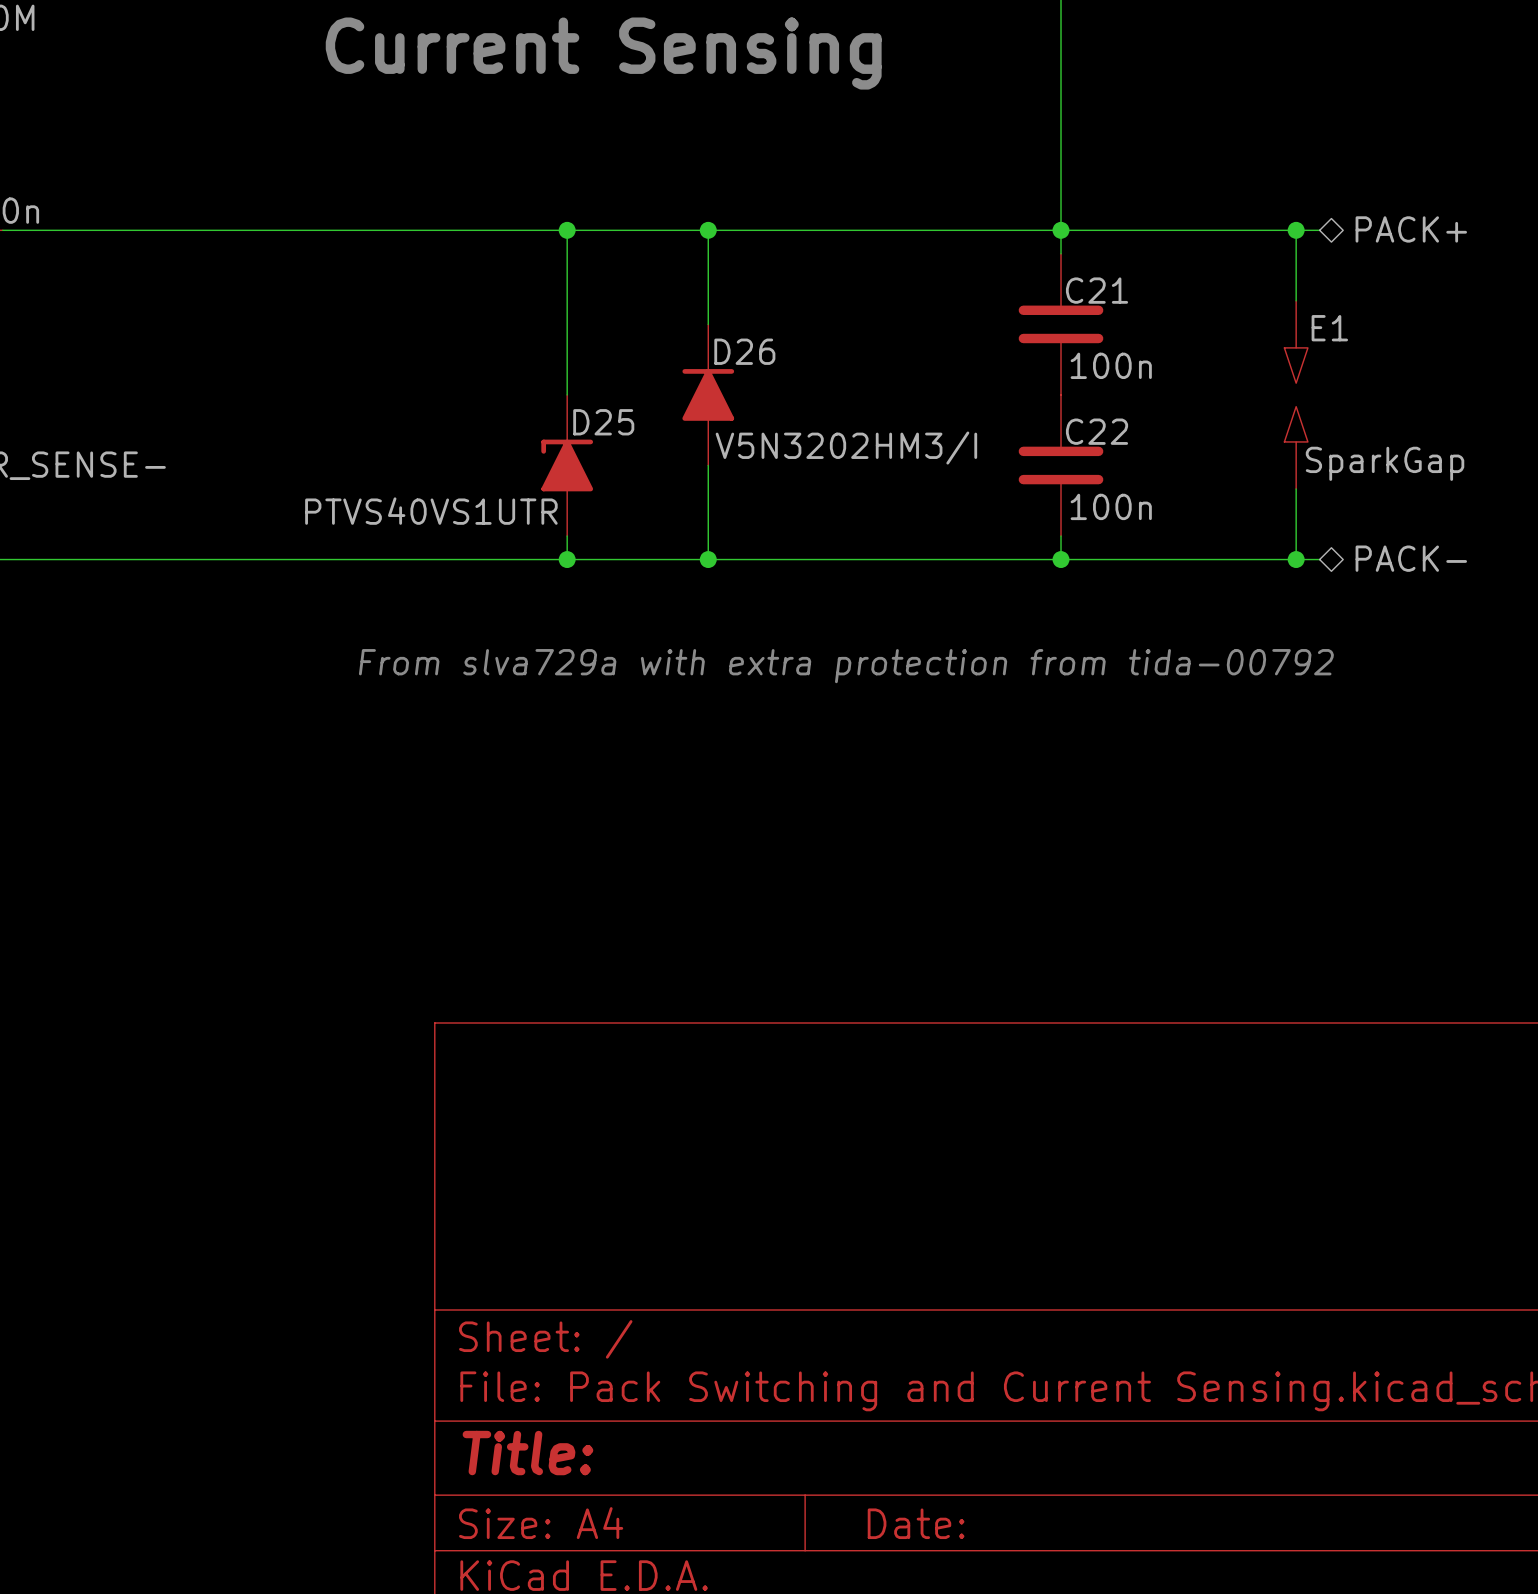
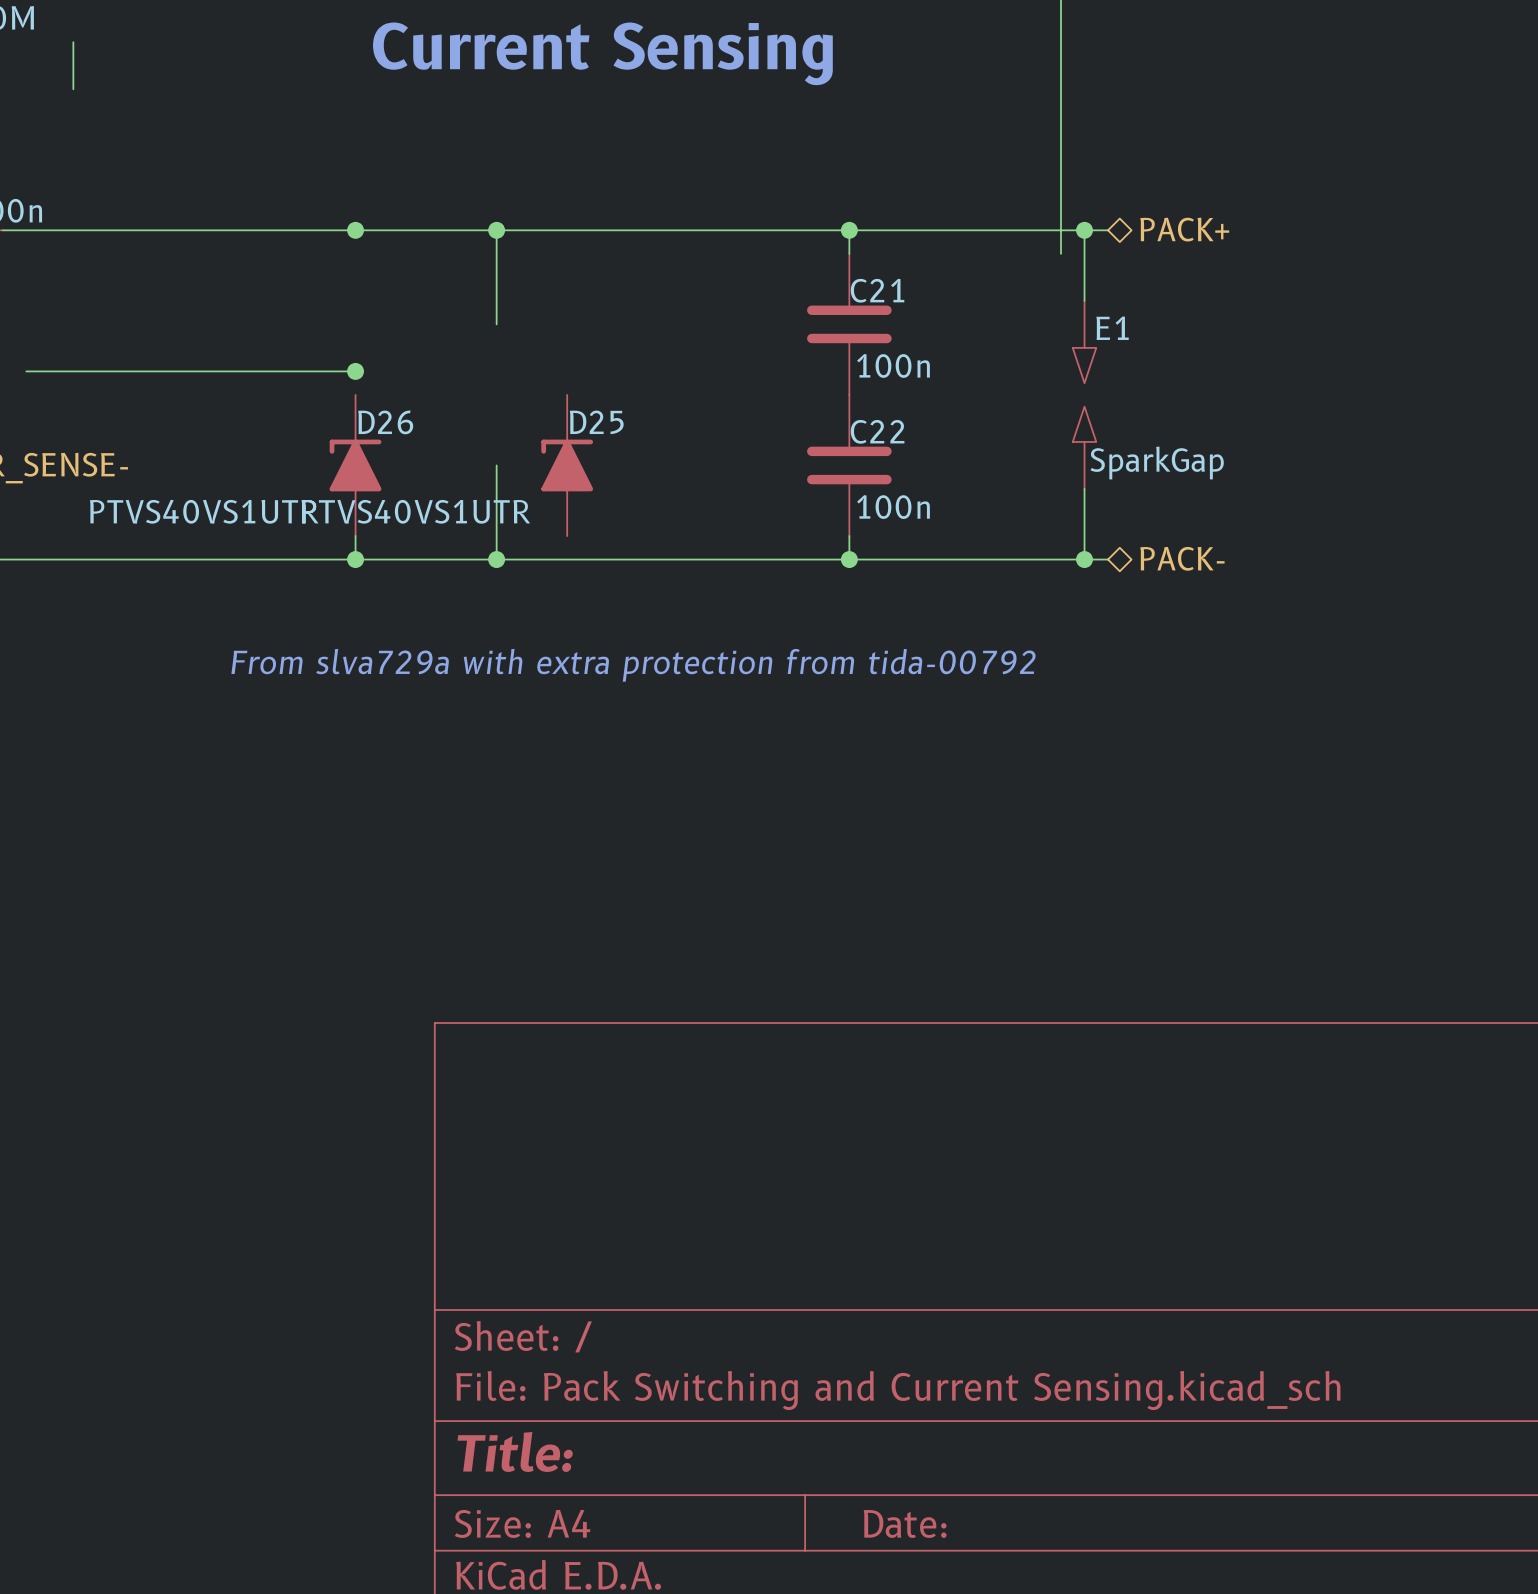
wire: none -> (73, 42) (73, 89)
hierarchical label position: PACK+ (1411, 229) -> PACK+ (1184, 229)
junction: none -> (355, 230)
wire: (567, 230) (567, 394) -> none
junction position: (567, 230) -> (496, 230)
wire: (708, 230) (708, 324) -> (496, 230) (496, 324)
junction: (708, 230) -> none
wire: none -> (849, 230) (849, 253)
junction: none -> (849, 230)
junction position: (1061, 230) -> (1084, 230)
wire: (1108, 230) (1319, 230) -> none
wire: (1296, 230) (1296, 300) -> (1084, 230) (1084, 300)
junction: (1296, 230) -> none
D26 symbol: [682, 324, 735, 466] -> [329, 394, 382, 537]
C21 position: (1061, 324) -> (849, 324)
wire: none -> (26, 371) (355, 371)
junction: none -> (355, 371)
E1 position: (1296, 394) -> (1084, 394)
D26 value: V5N3202HM3/I (846, 448) -> PTVS40VS1UTR (204, 511)
wire: (708, 465) (708, 559) -> (496, 465) (496, 559)
C22 position: (1061, 465) -> (849, 465)
wire: (1296, 489) (1296, 559) -> (1084, 489) (1084, 559)
wire: (567, 536) (567, 559) -> (355, 536) (355, 559)
wire: (1061, 536) (1061, 559) -> (849, 536) (849, 559)
hierarchical label position: PACK- (1411, 558) -> PACK- (1182, 558)
junction: none -> (355, 559)
junction position: (567, 559) -> (496, 559)
junction: (708, 559) -> none
junction: none -> (849, 559)
junction position: (1061, 559) -> (1084, 559)
wire: (1108, 559) (1319, 559) -> none
junction: (1296, 559) -> none
text position: From slva729a with extra protection from tida-00792 (846, 666) -> From slva729a with extra protection from tida-00792 (633, 665)

